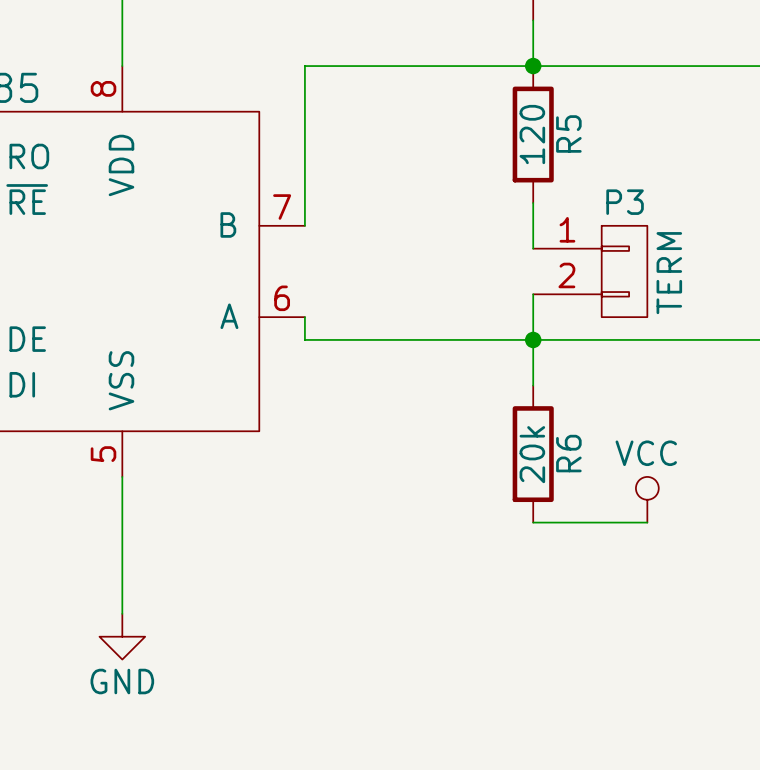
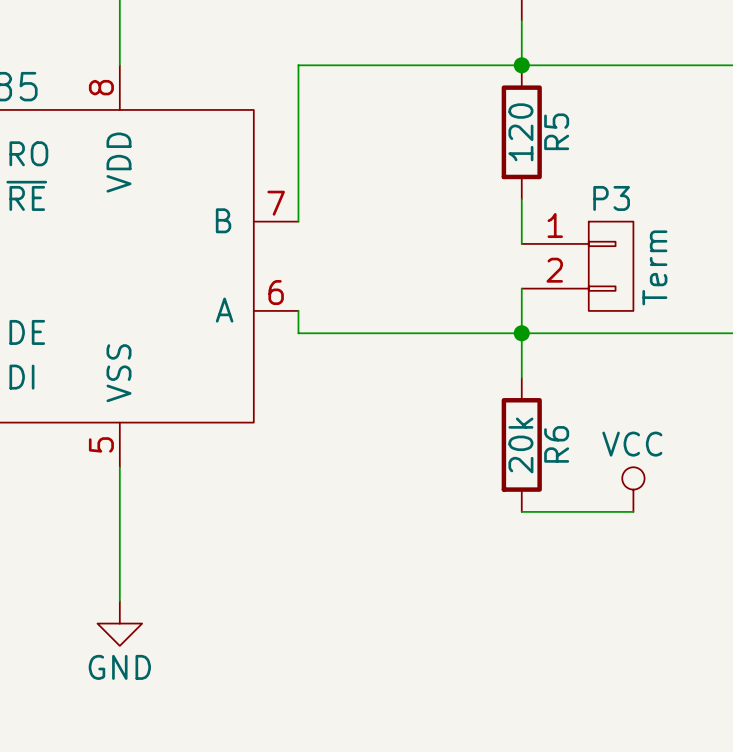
P3 value: TERM (669, 273) -> Term (654, 267)

